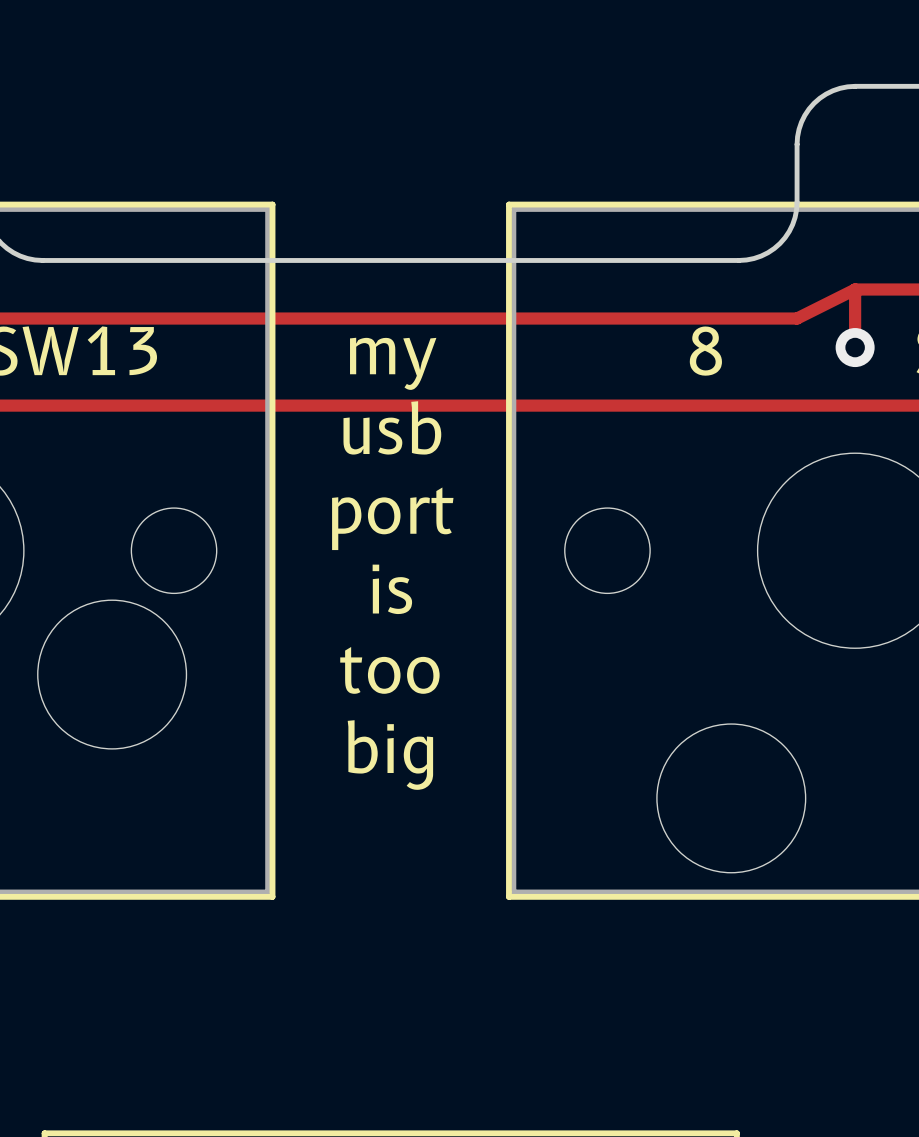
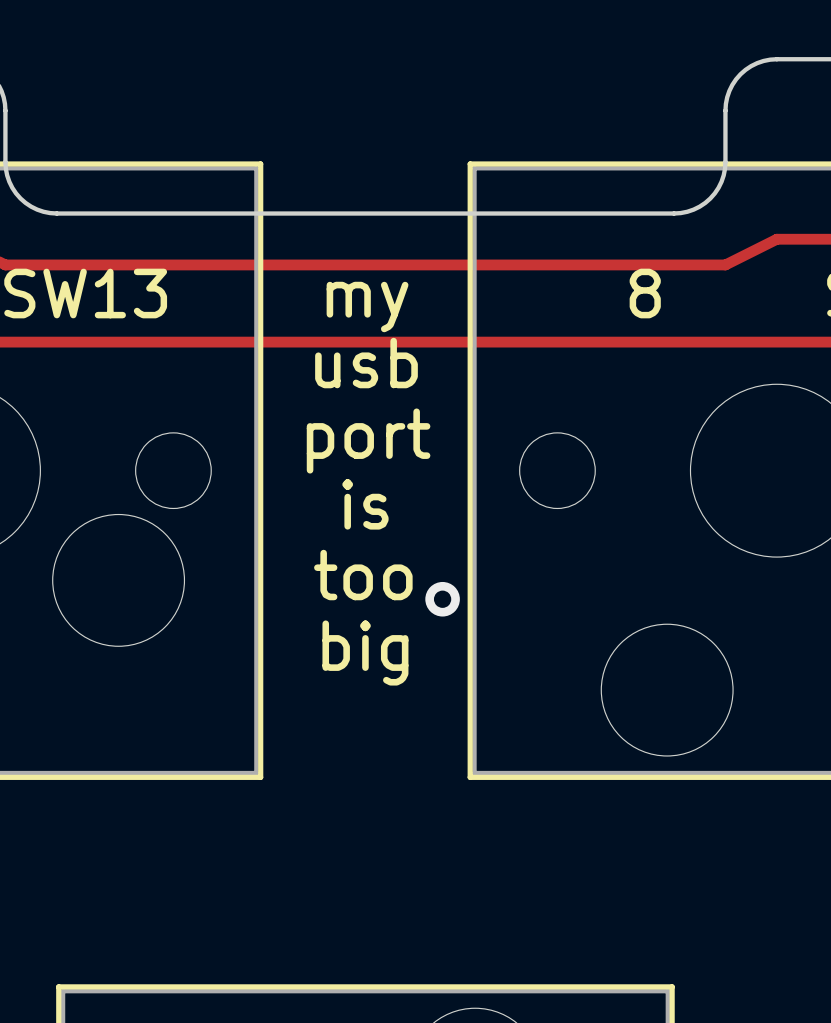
track: (855, 289) (855, 347) -> none
via: (855, 347) -> none
via: none -> (442, 599)

